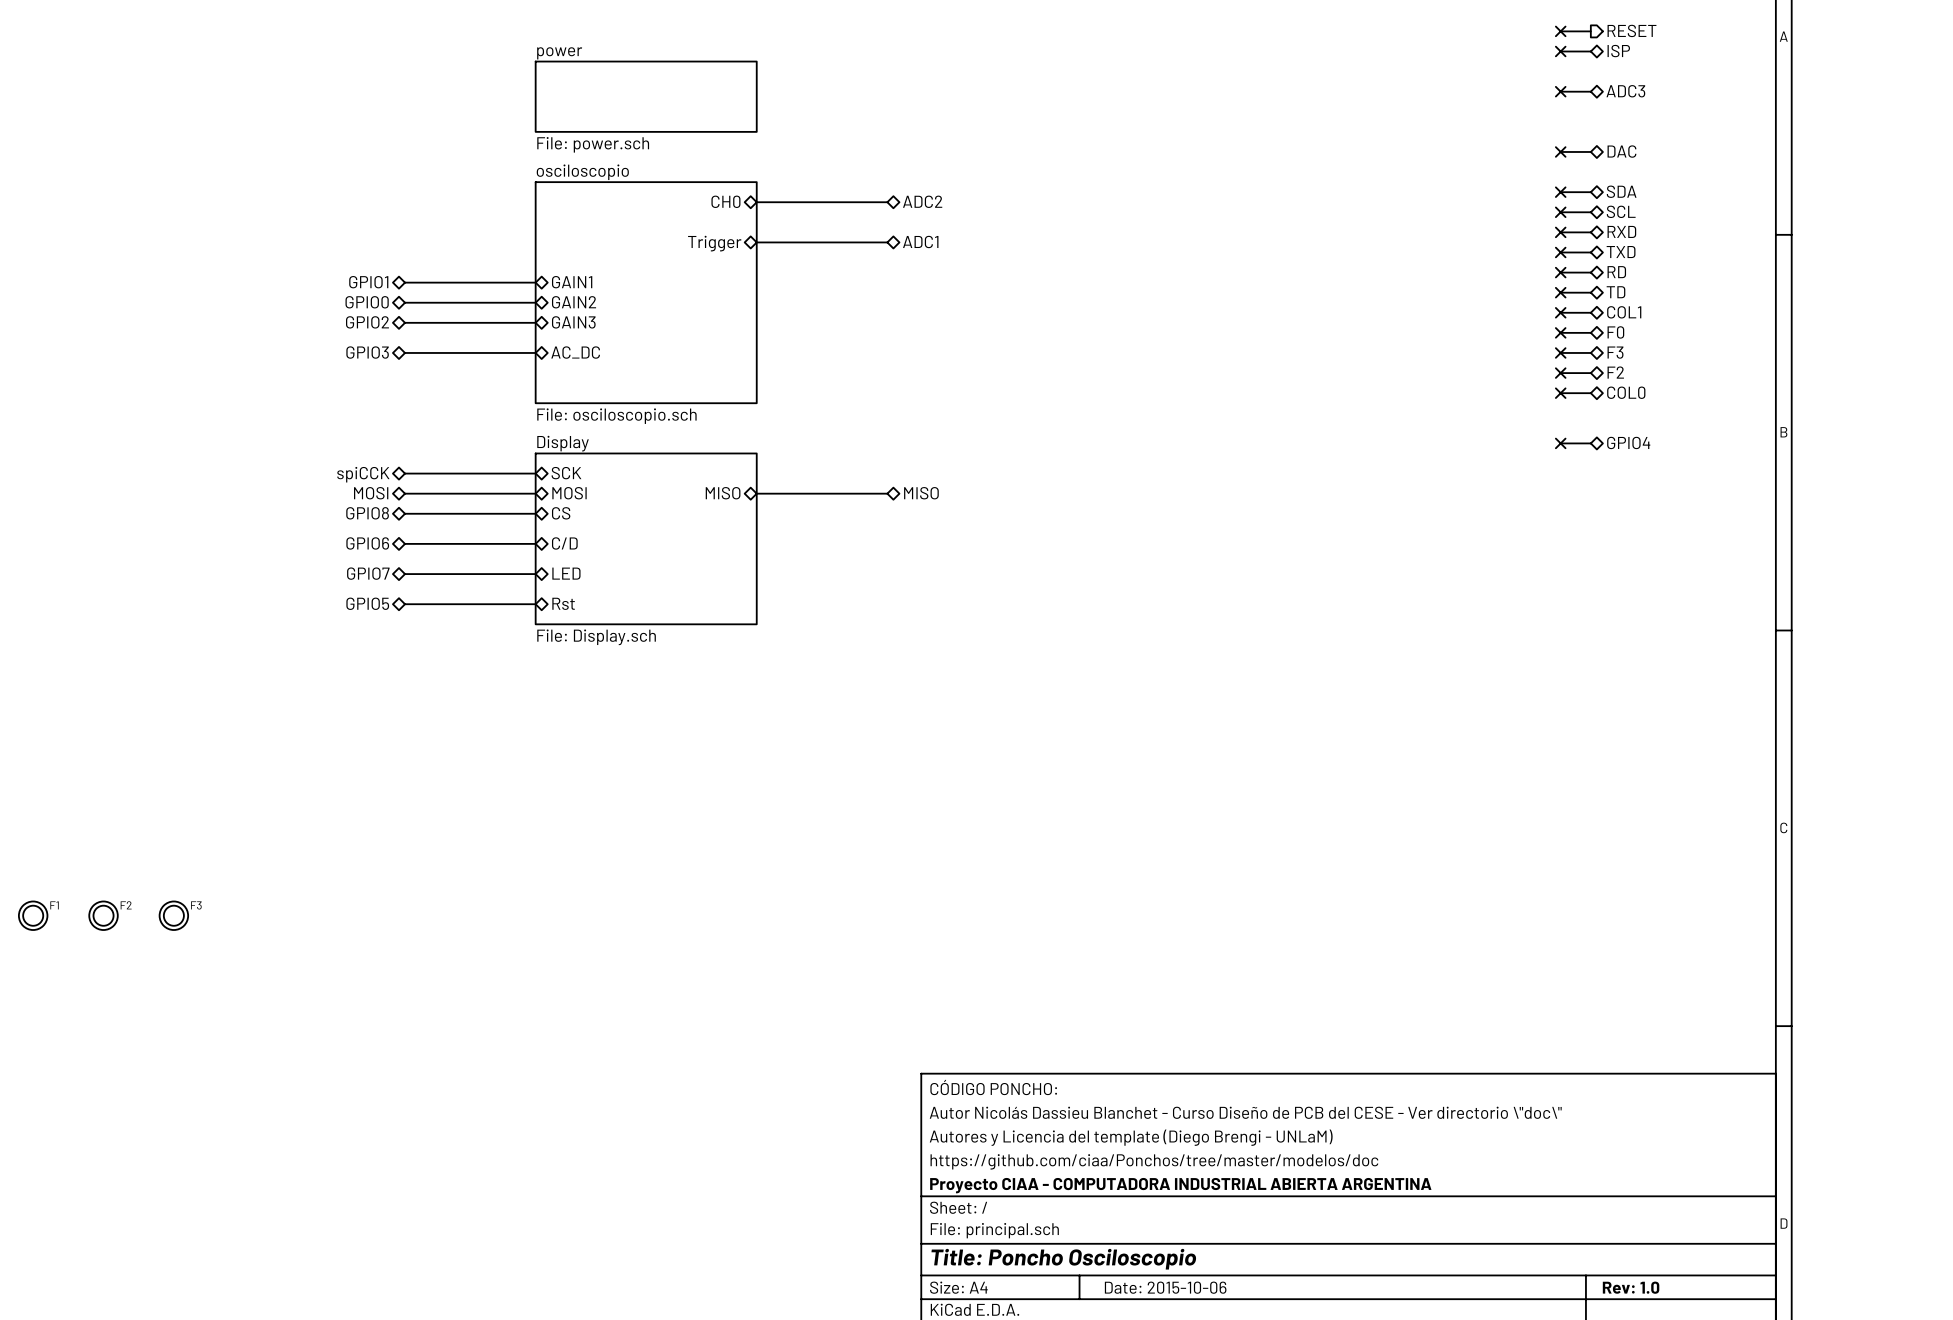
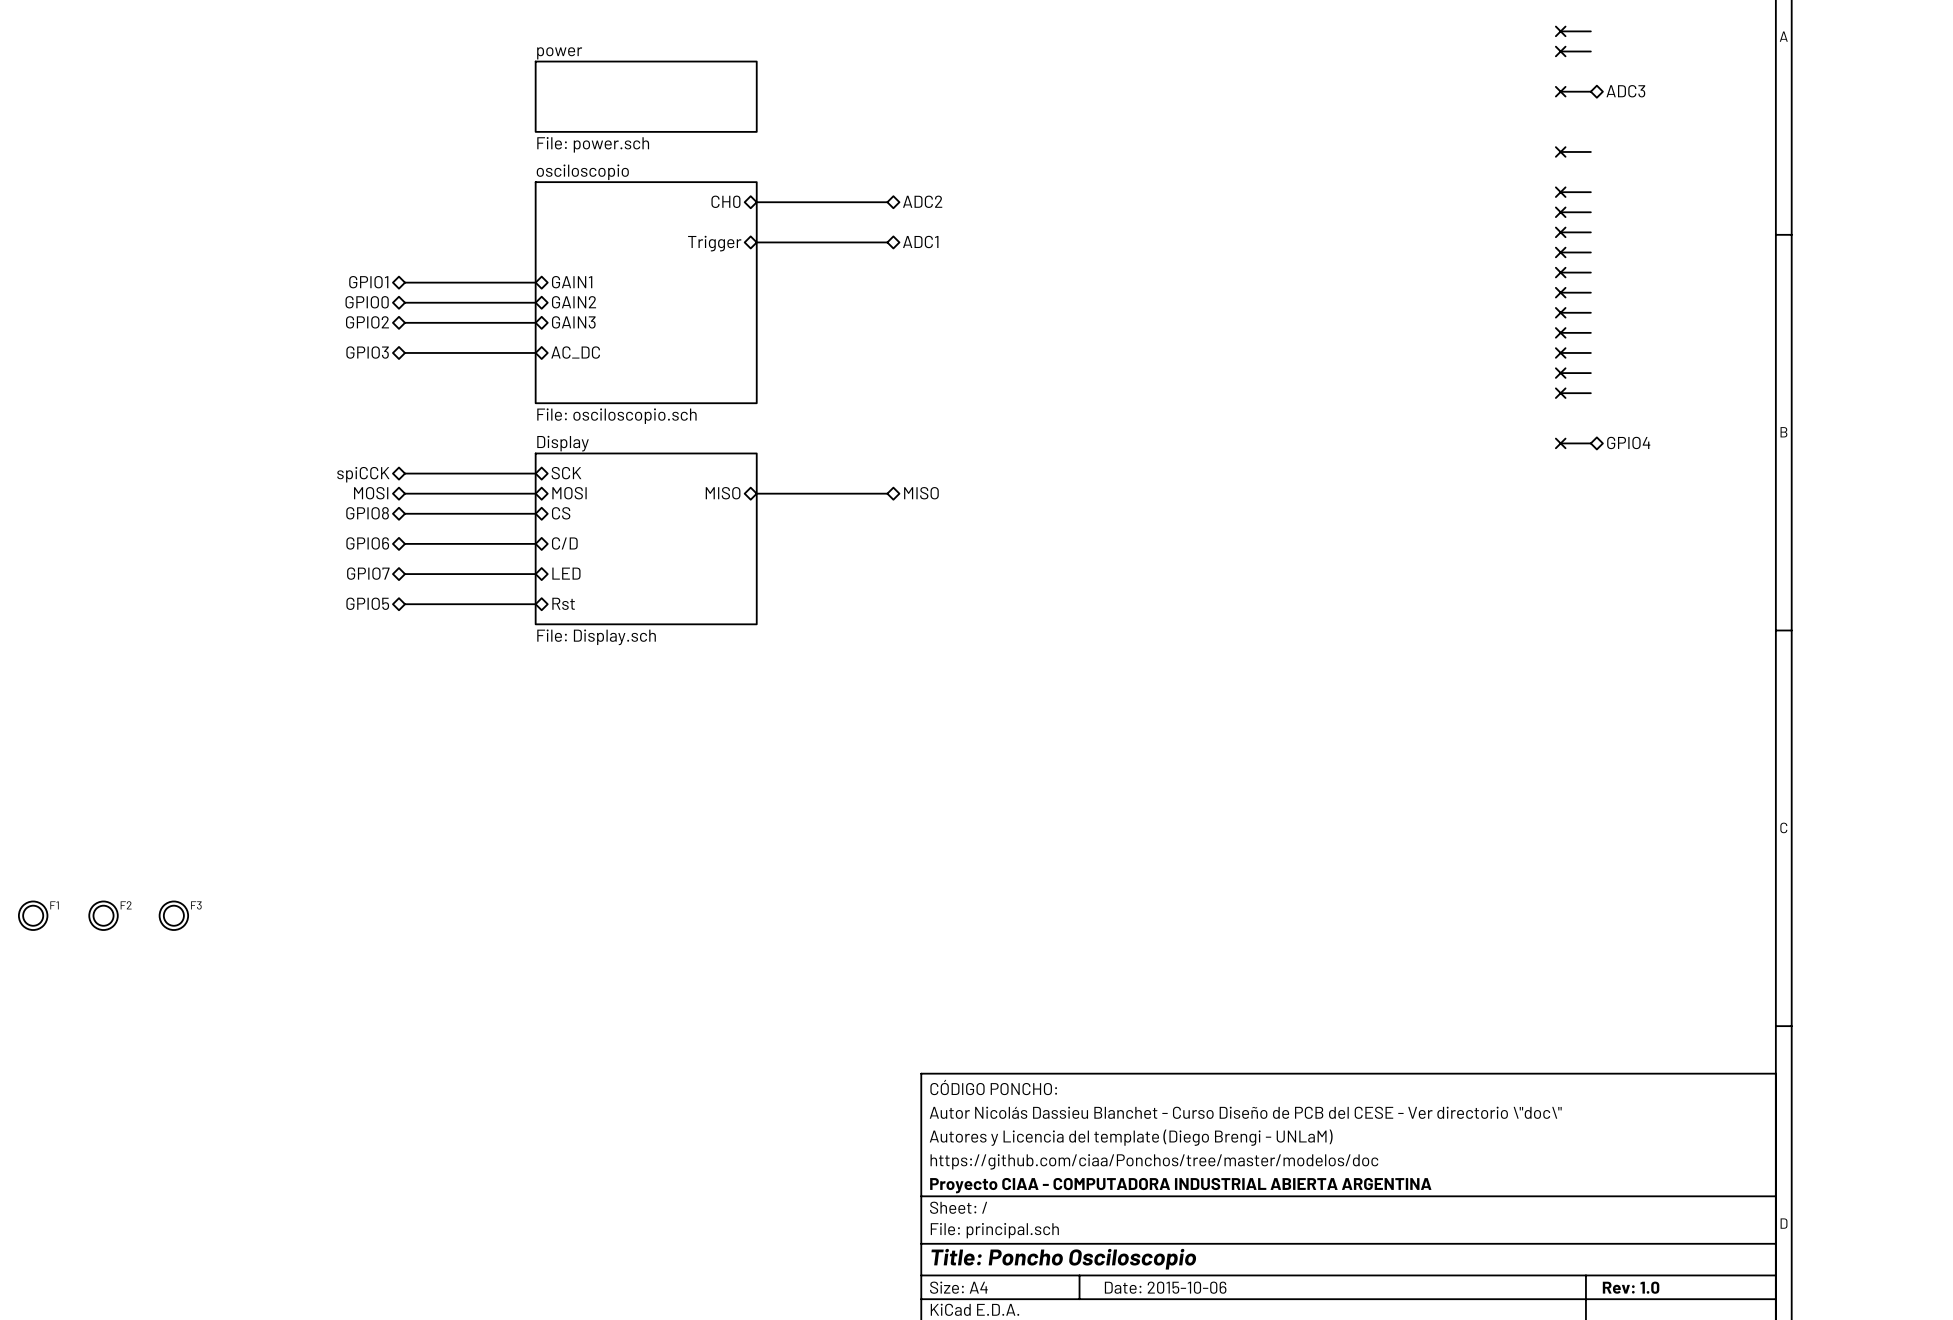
hierarchical label: RESET (1631, 30) -> none
hierarchical label: ISP (1618, 51) -> none
hierarchical label: DAC (1621, 151) -> none
hierarchical label: SDA (1621, 191) -> none
hierarchical label: SCL (1621, 211) -> none
hierarchical label: RXD (1621, 231) -> none
hierarchical label: TXD (1621, 252) -> none
hierarchical label: RD (1616, 272) -> none
hierarchical label: TD (1615, 292) -> none
hierarchical label: COL1 (1624, 312) -> none
hierarchical label: F0 (1615, 332) -> none
hierarchical label: F3 (1615, 352) -> none
hierarchical label: F2 (1615, 372) -> none
hierarchical label: COL0 (1626, 392) -> none

